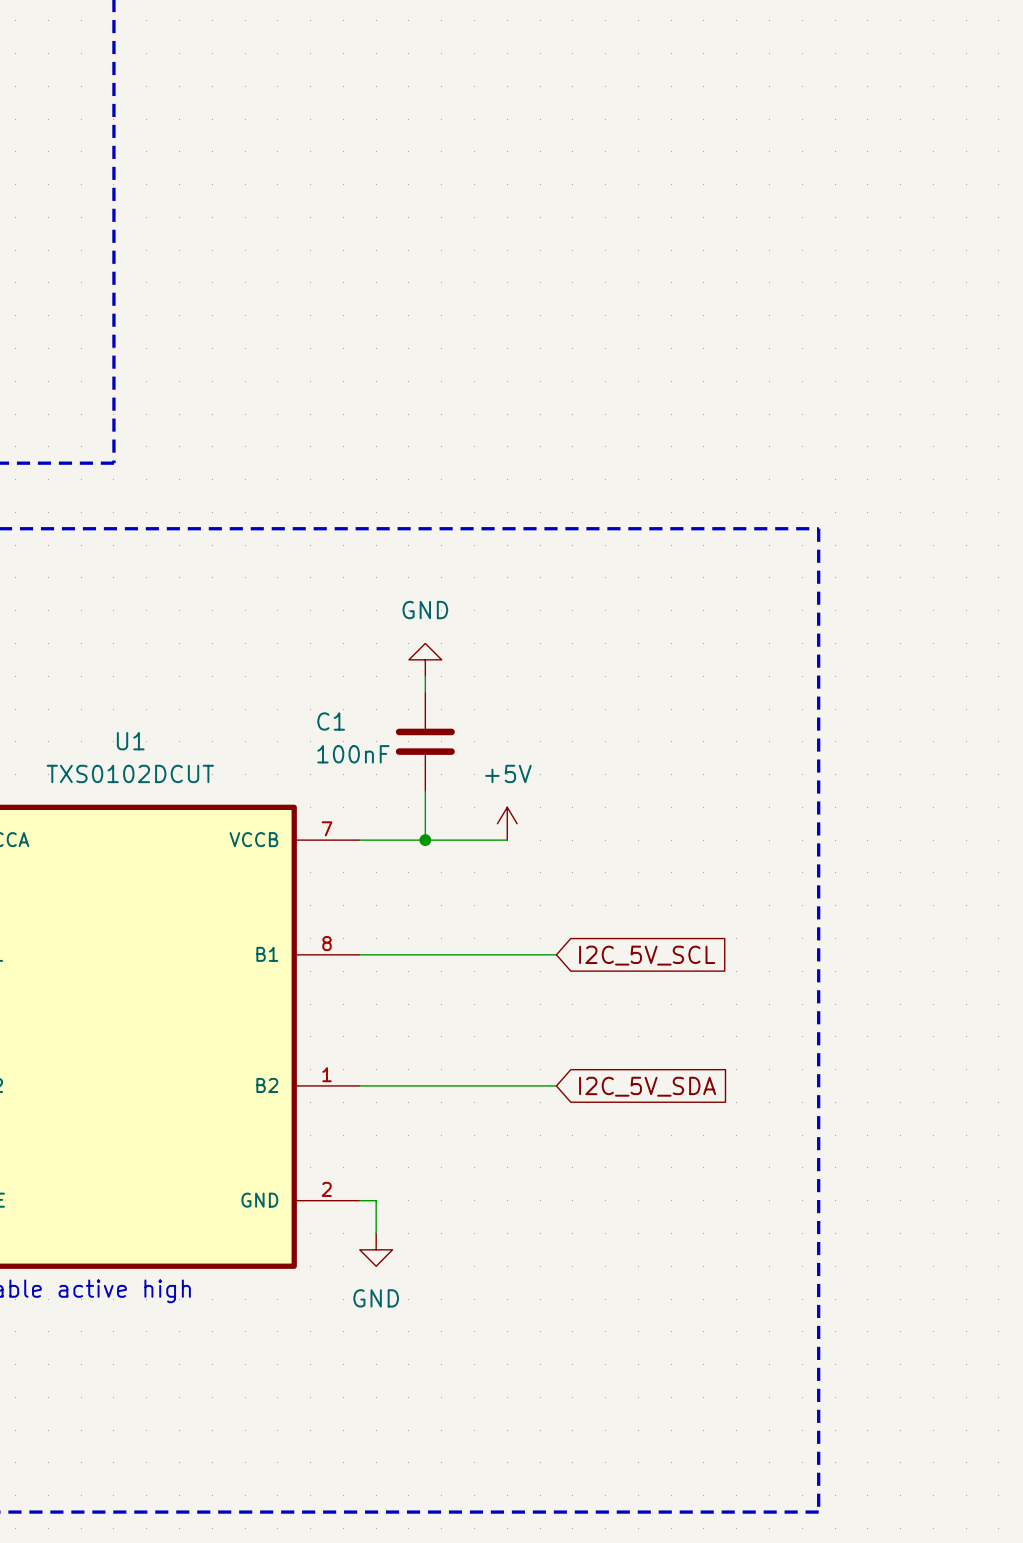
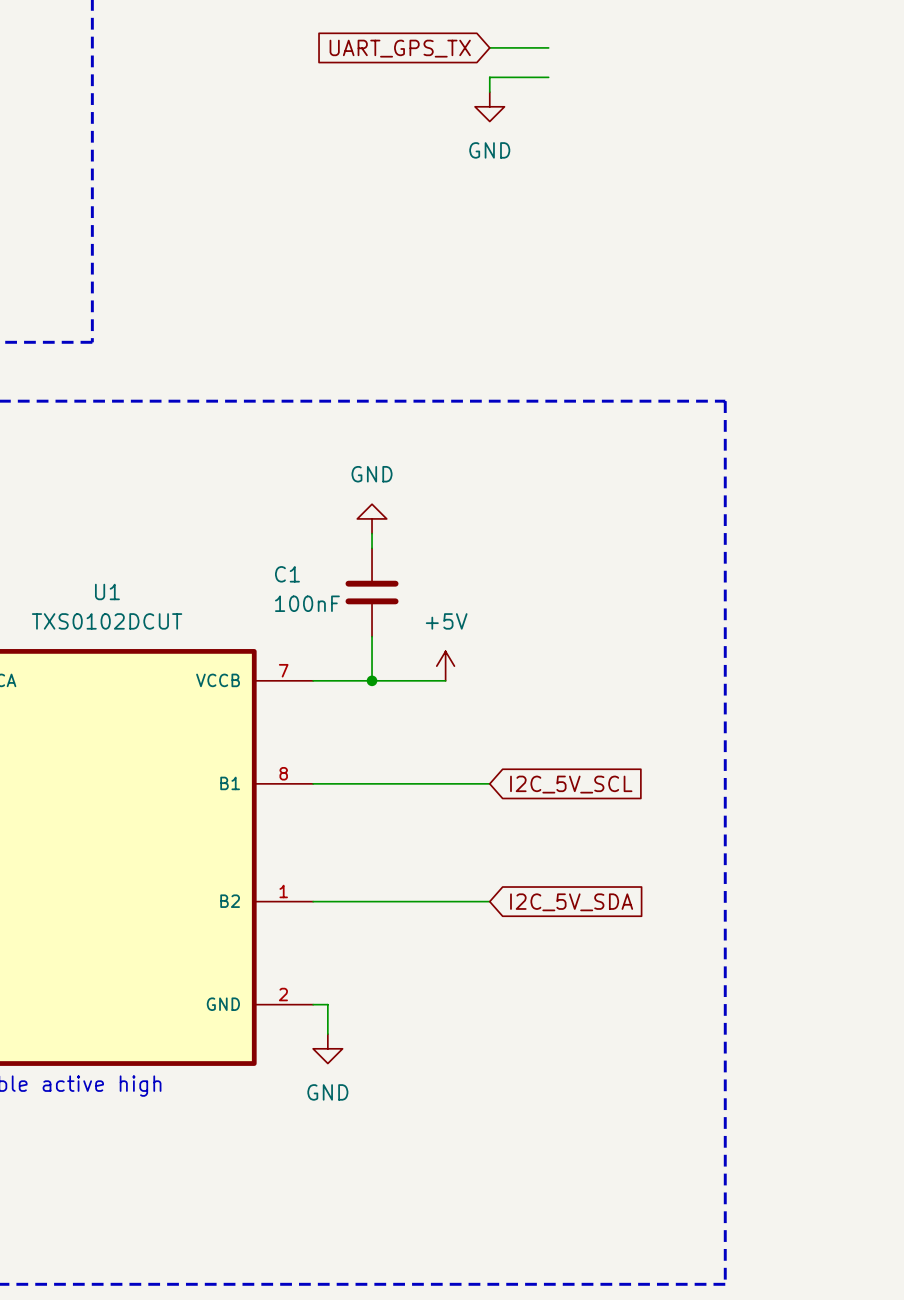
wire: none -> (489, 47) (548, 47)
global label: none -> UART_GPS_TX (400, 48)
wire: none -> (548, 77) (489, 77) (489, 92)
power symbol: none -> GND (489, 106)

